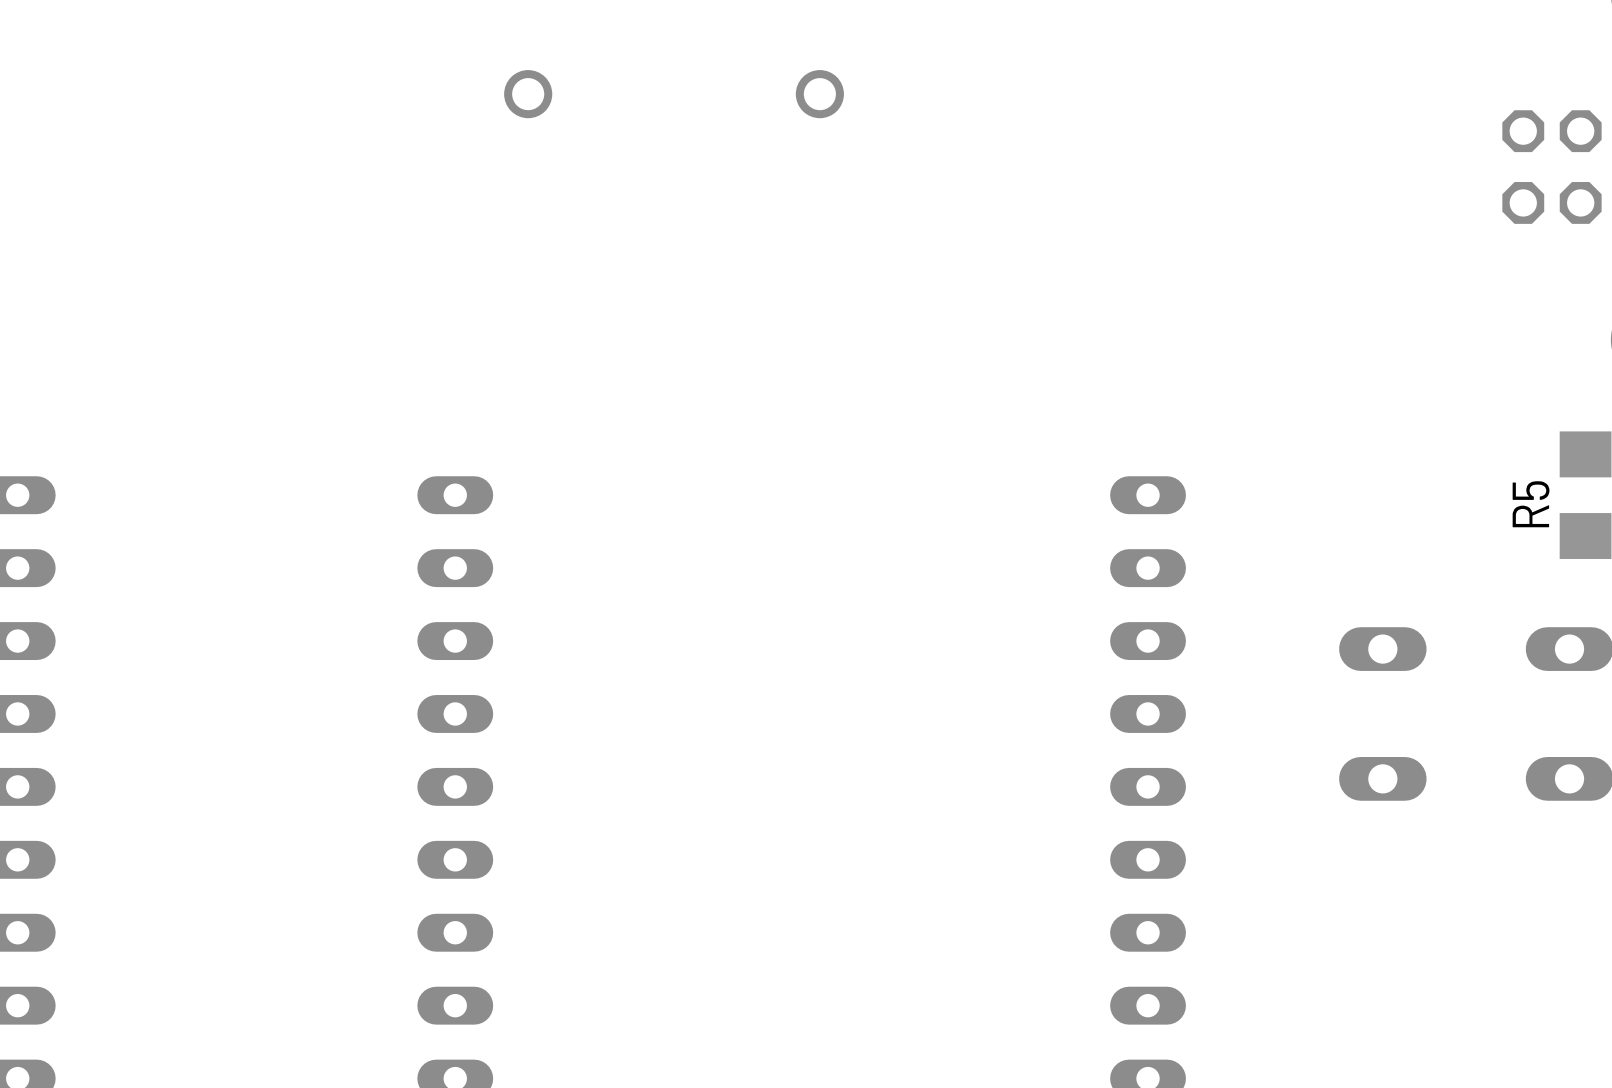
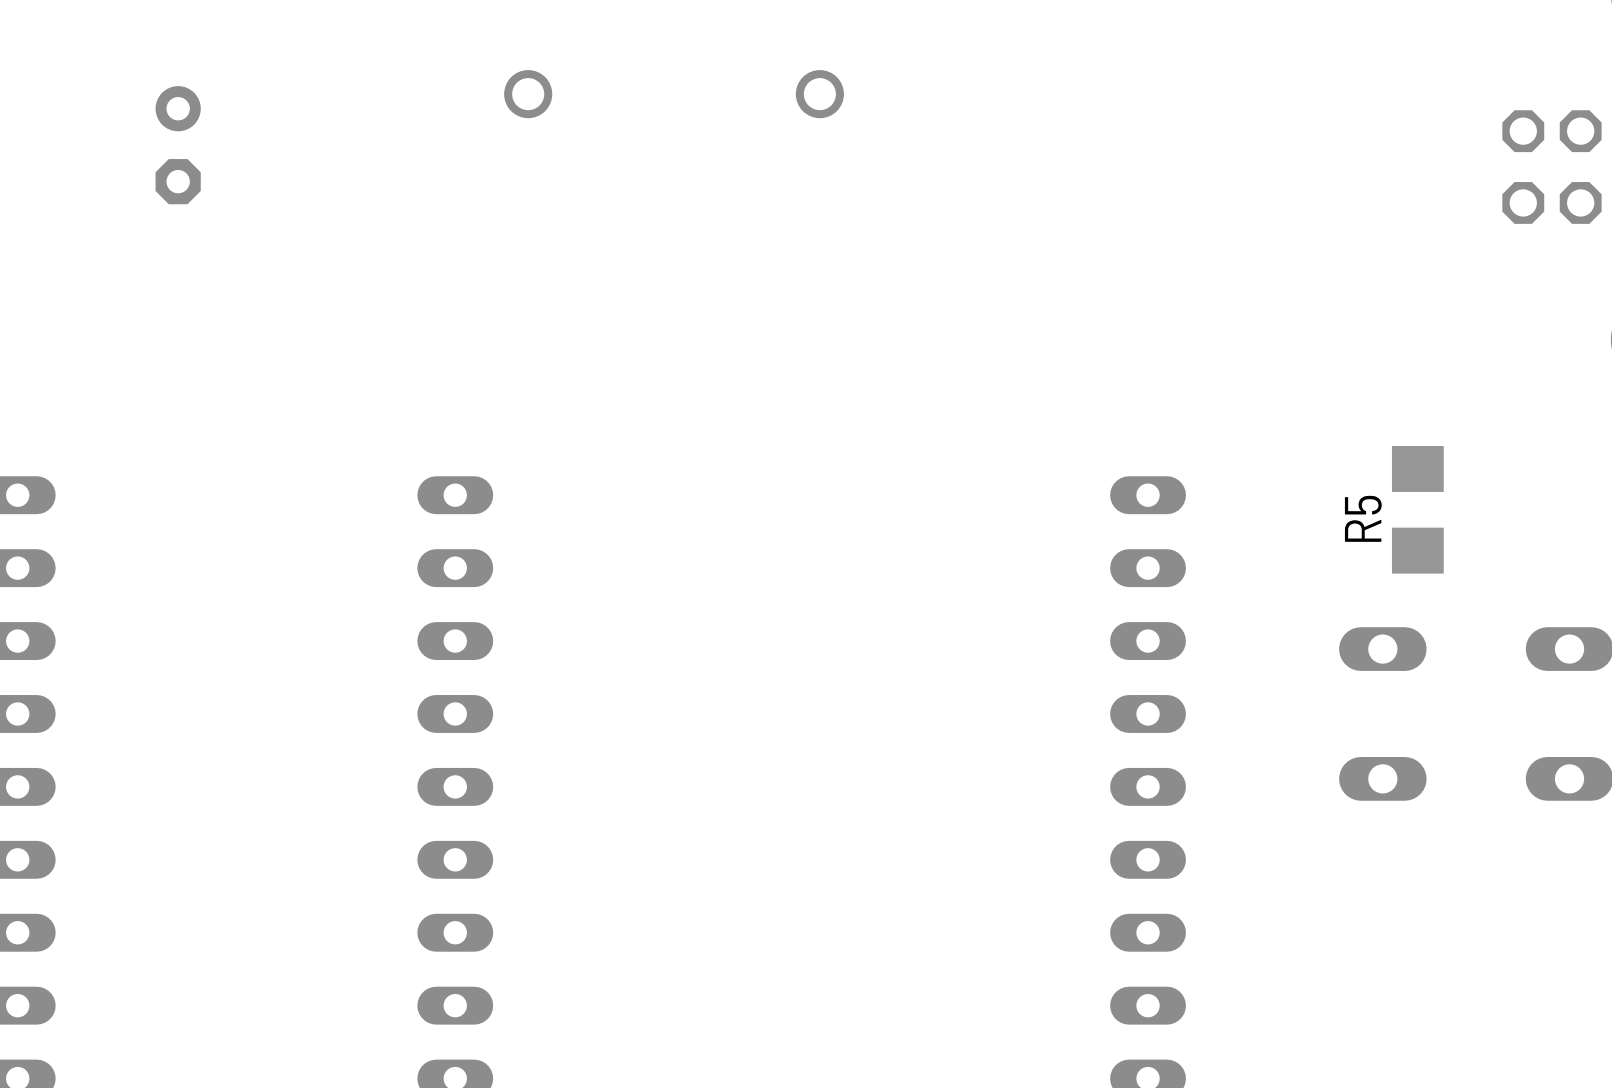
part: none -> (178, 145)
R5 position: (1585, 495) -> (1417, 509)

